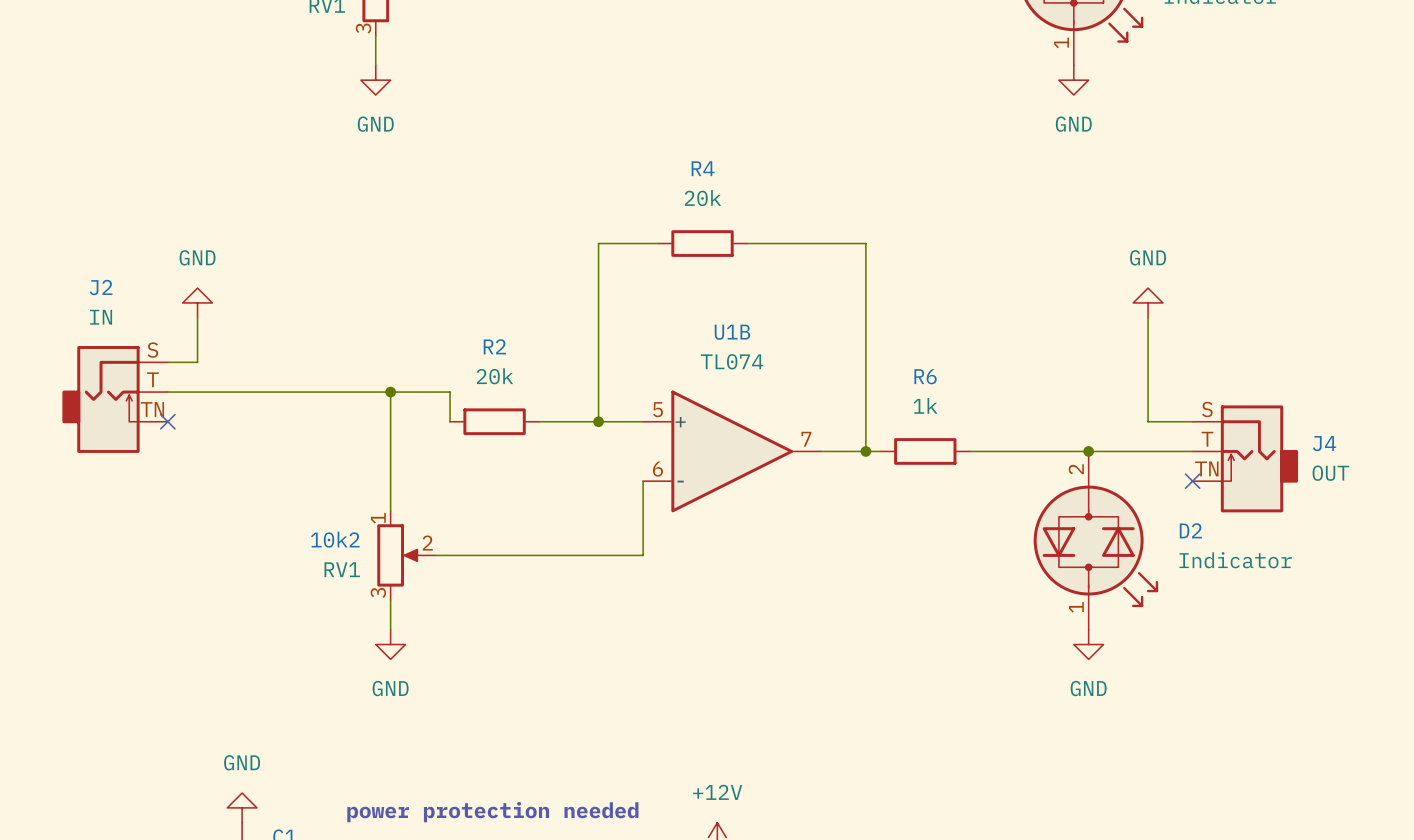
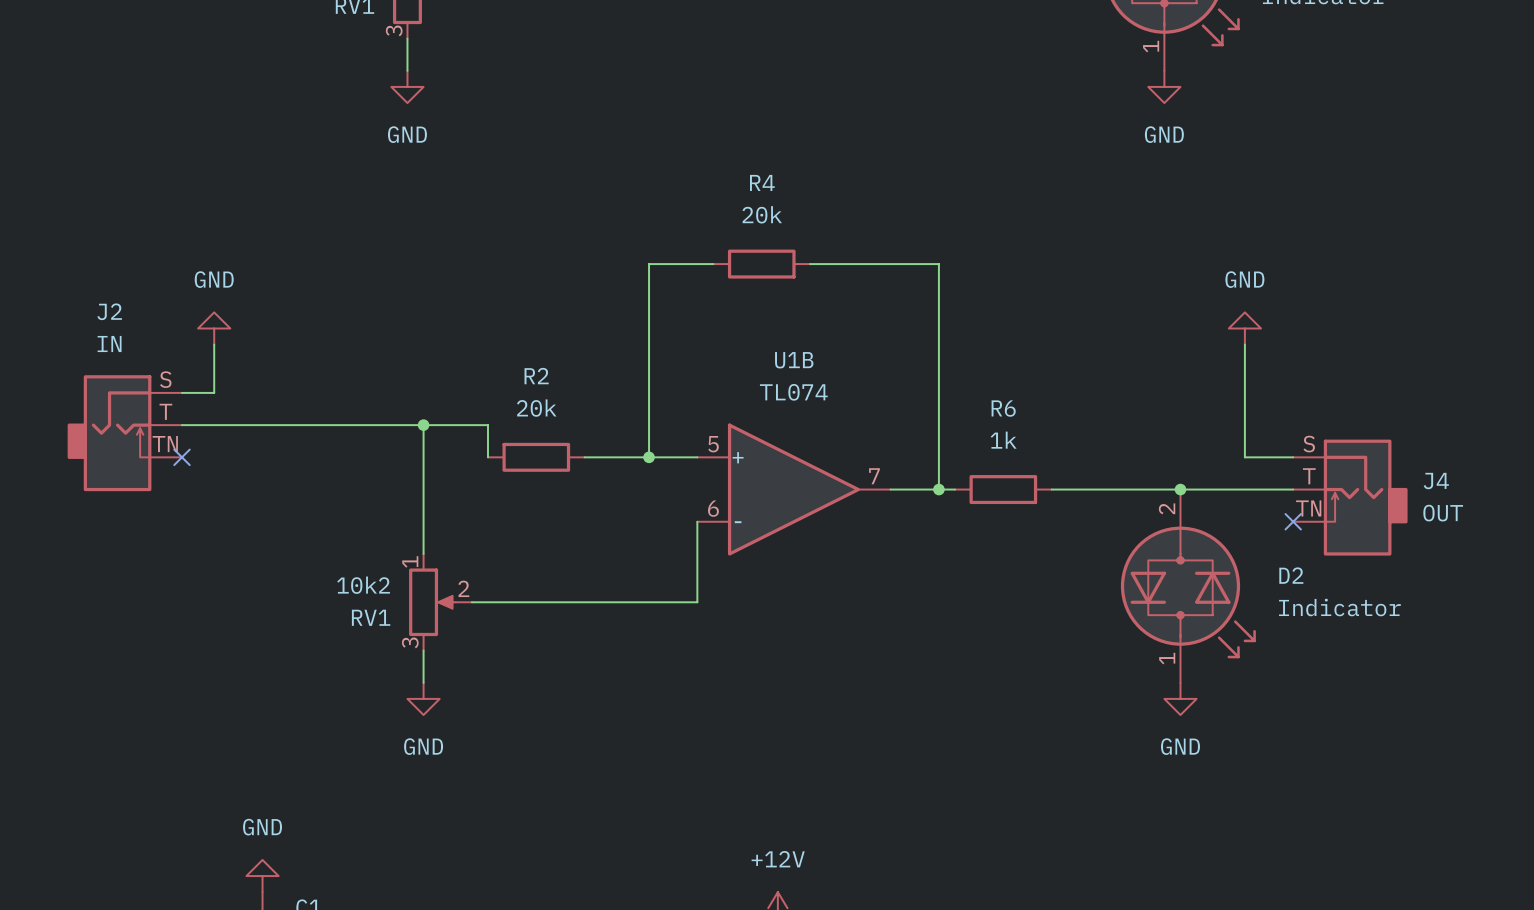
text: power protection needed (492, 812) -> none

